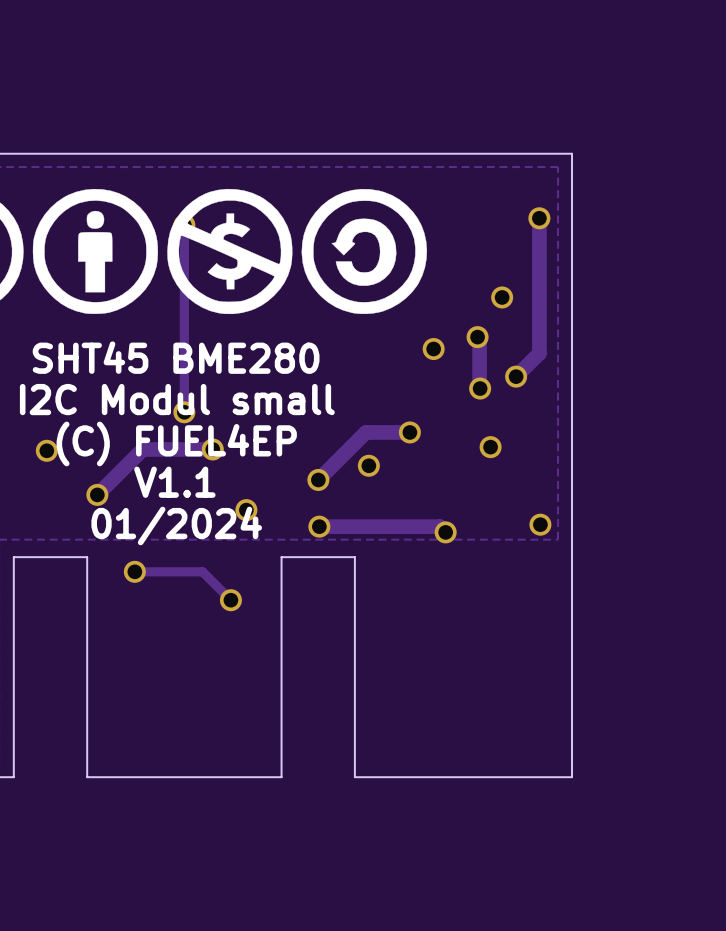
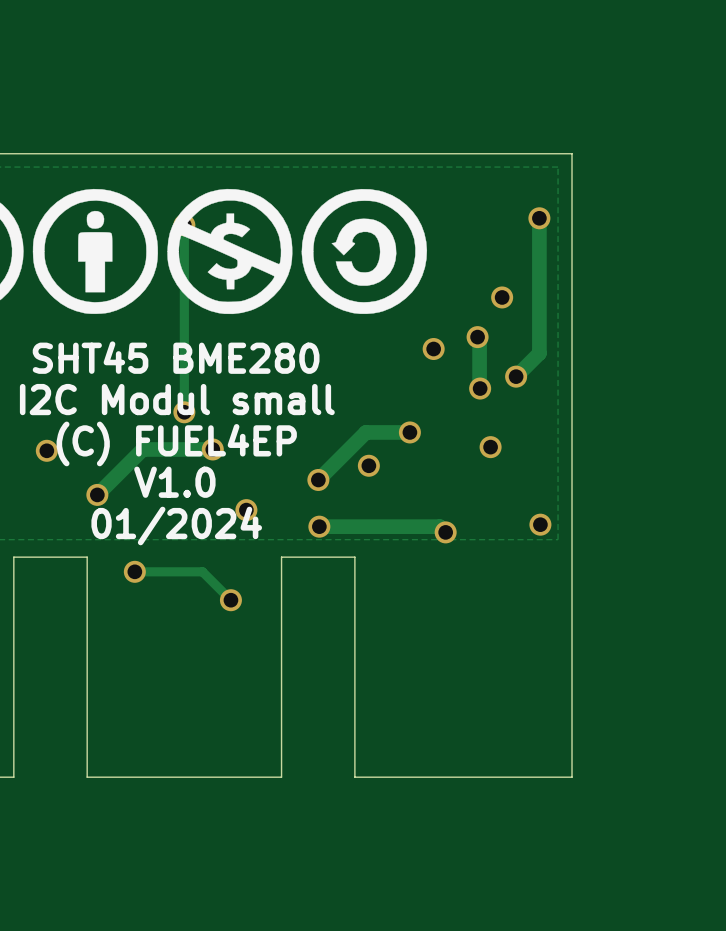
text: V1.1 (174, 482) -> V1.0 (174, 482)

